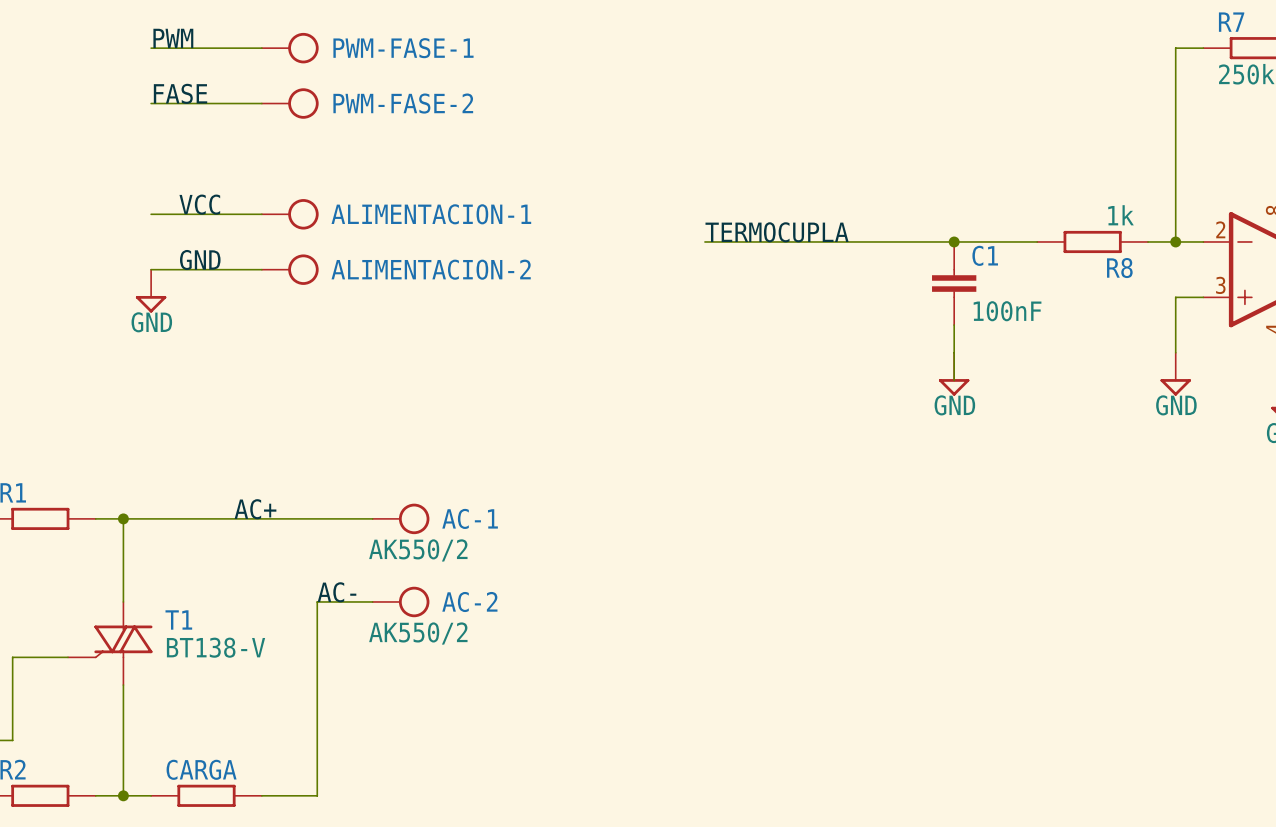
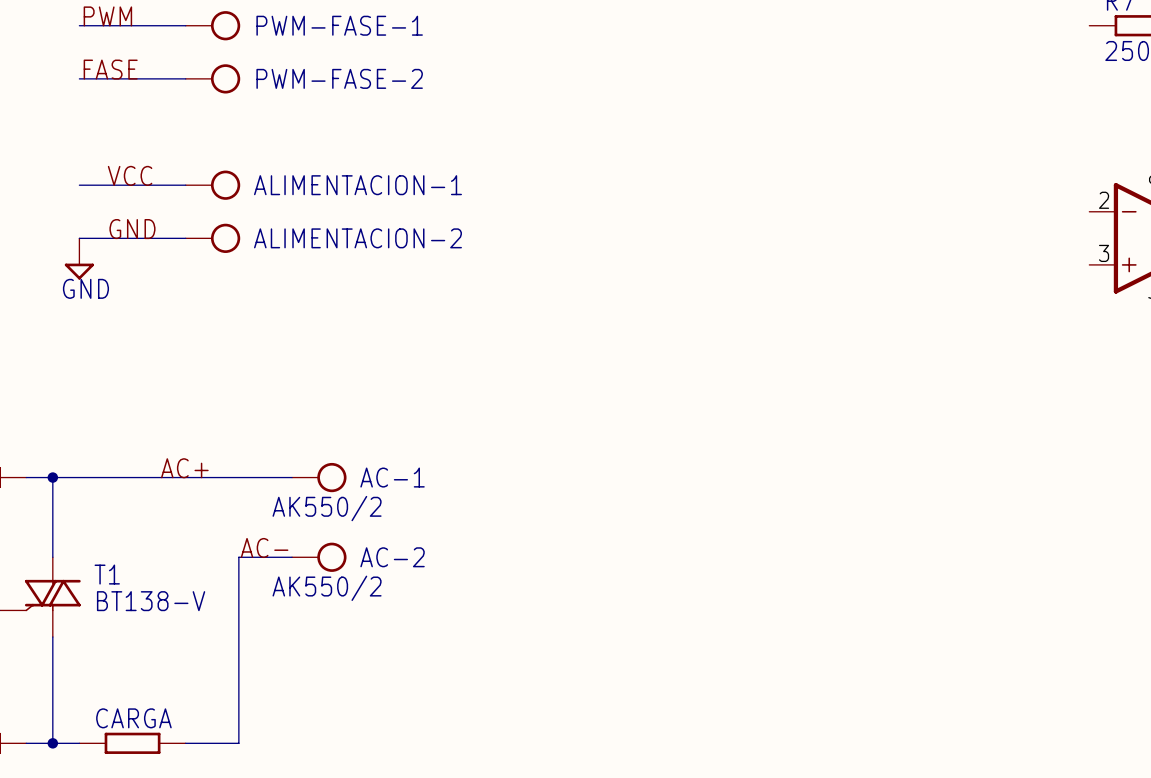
wire: (1203, 48) (1175, 48) (1175, 241) -> none
label: TERMOCUPLA (777, 232) -> none
wire: (704, 241) (1037, 241) -> none
junction: (954, 241) -> none
R8: 1k (1092, 241) -> none
wire: (1148, 241) (1203, 241) -> none
junction: (1175, 241) -> none
C1: 100nF (954, 283) -> none
wire: (1203, 297) (1175, 297) (1175, 352) -> none
wire: (954, 325) (954, 380) -> none
power symbol: GND (954, 374) -> none
power symbol: GND (1175, 374) -> none

